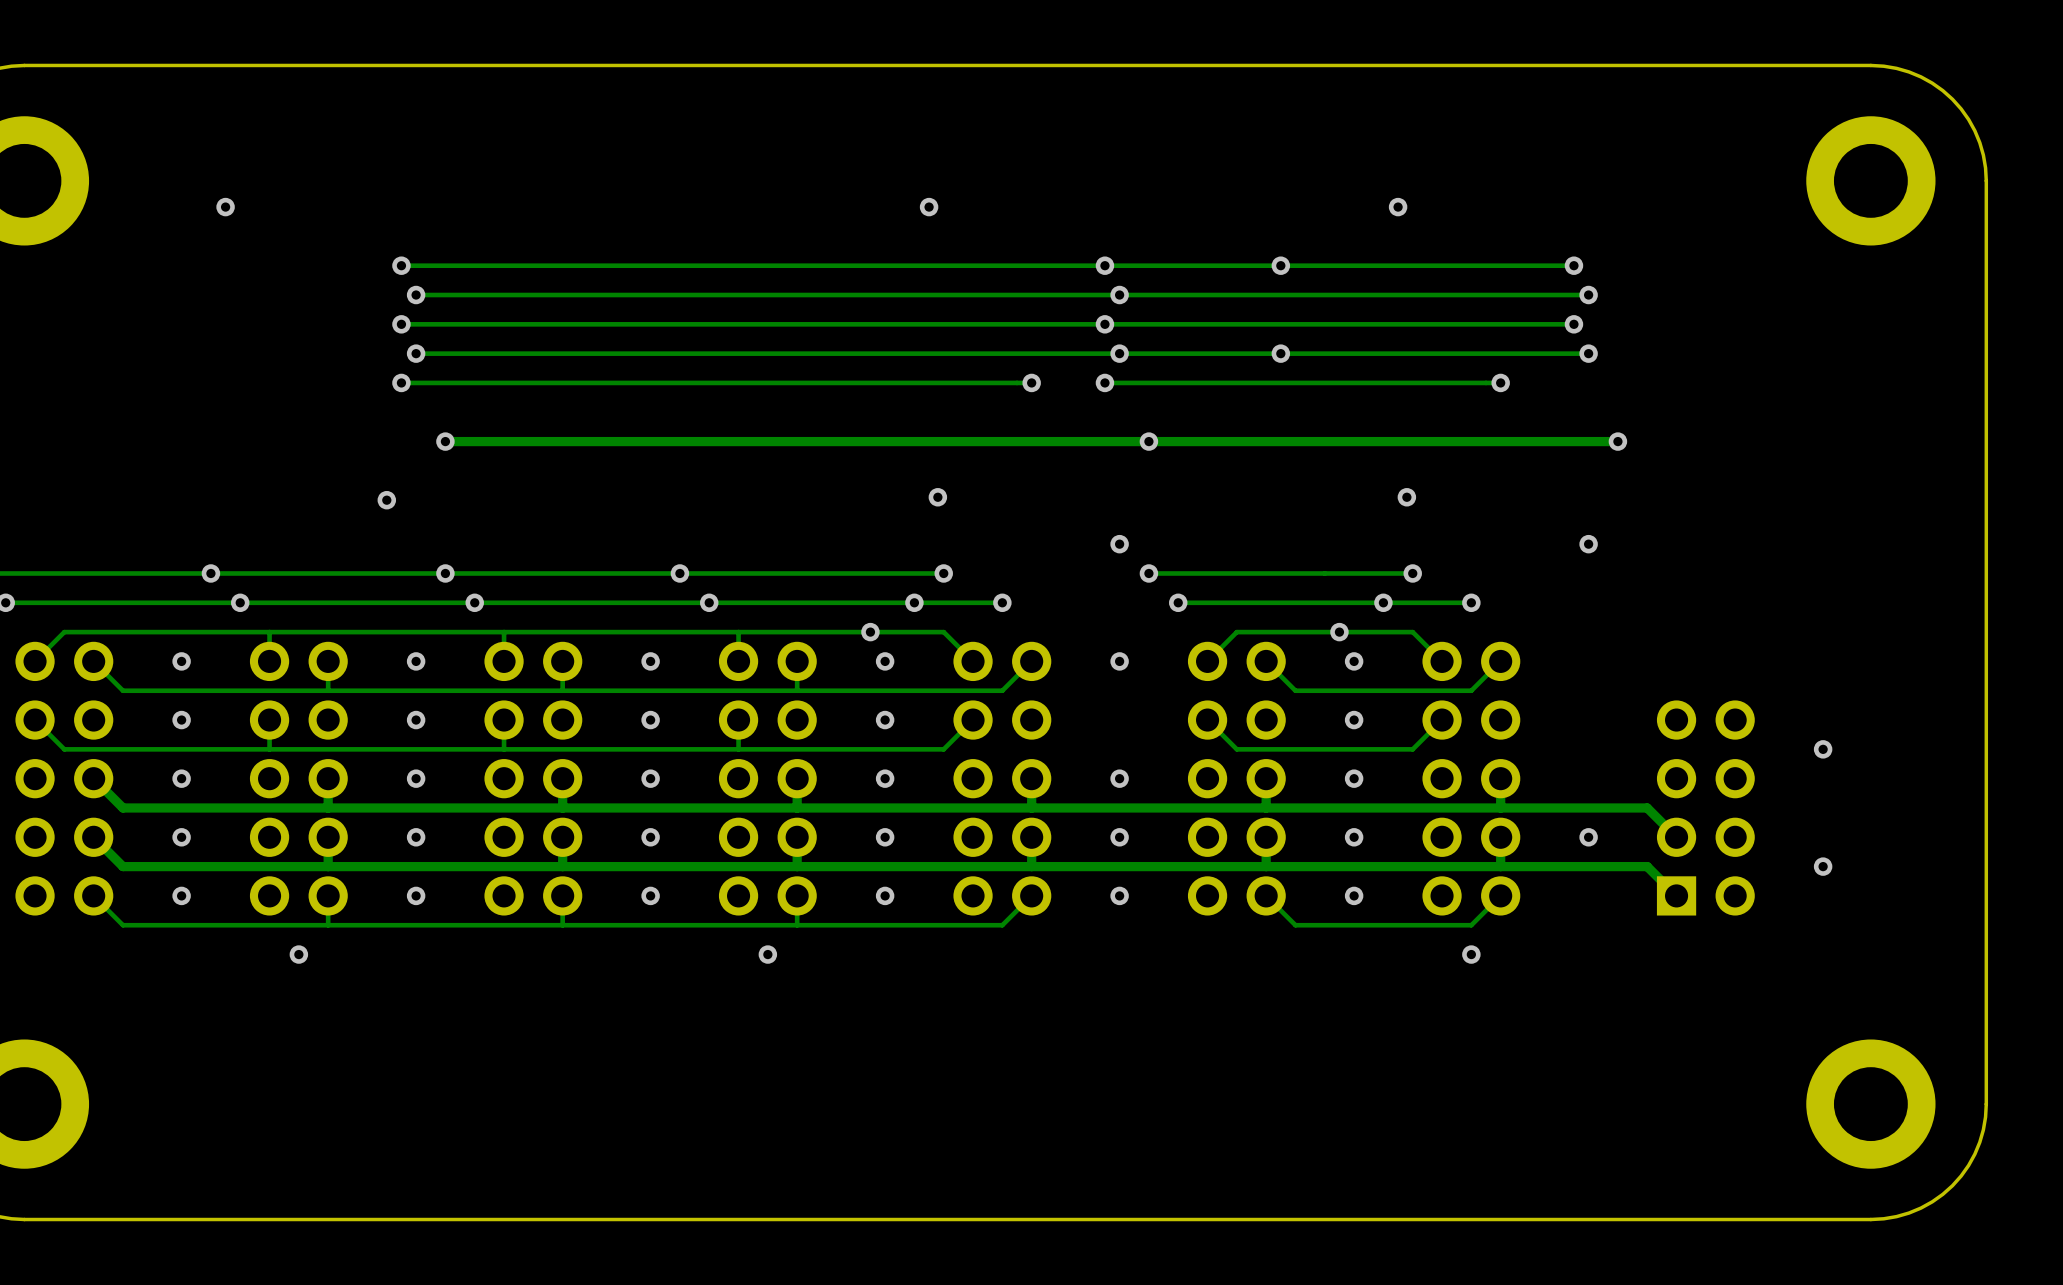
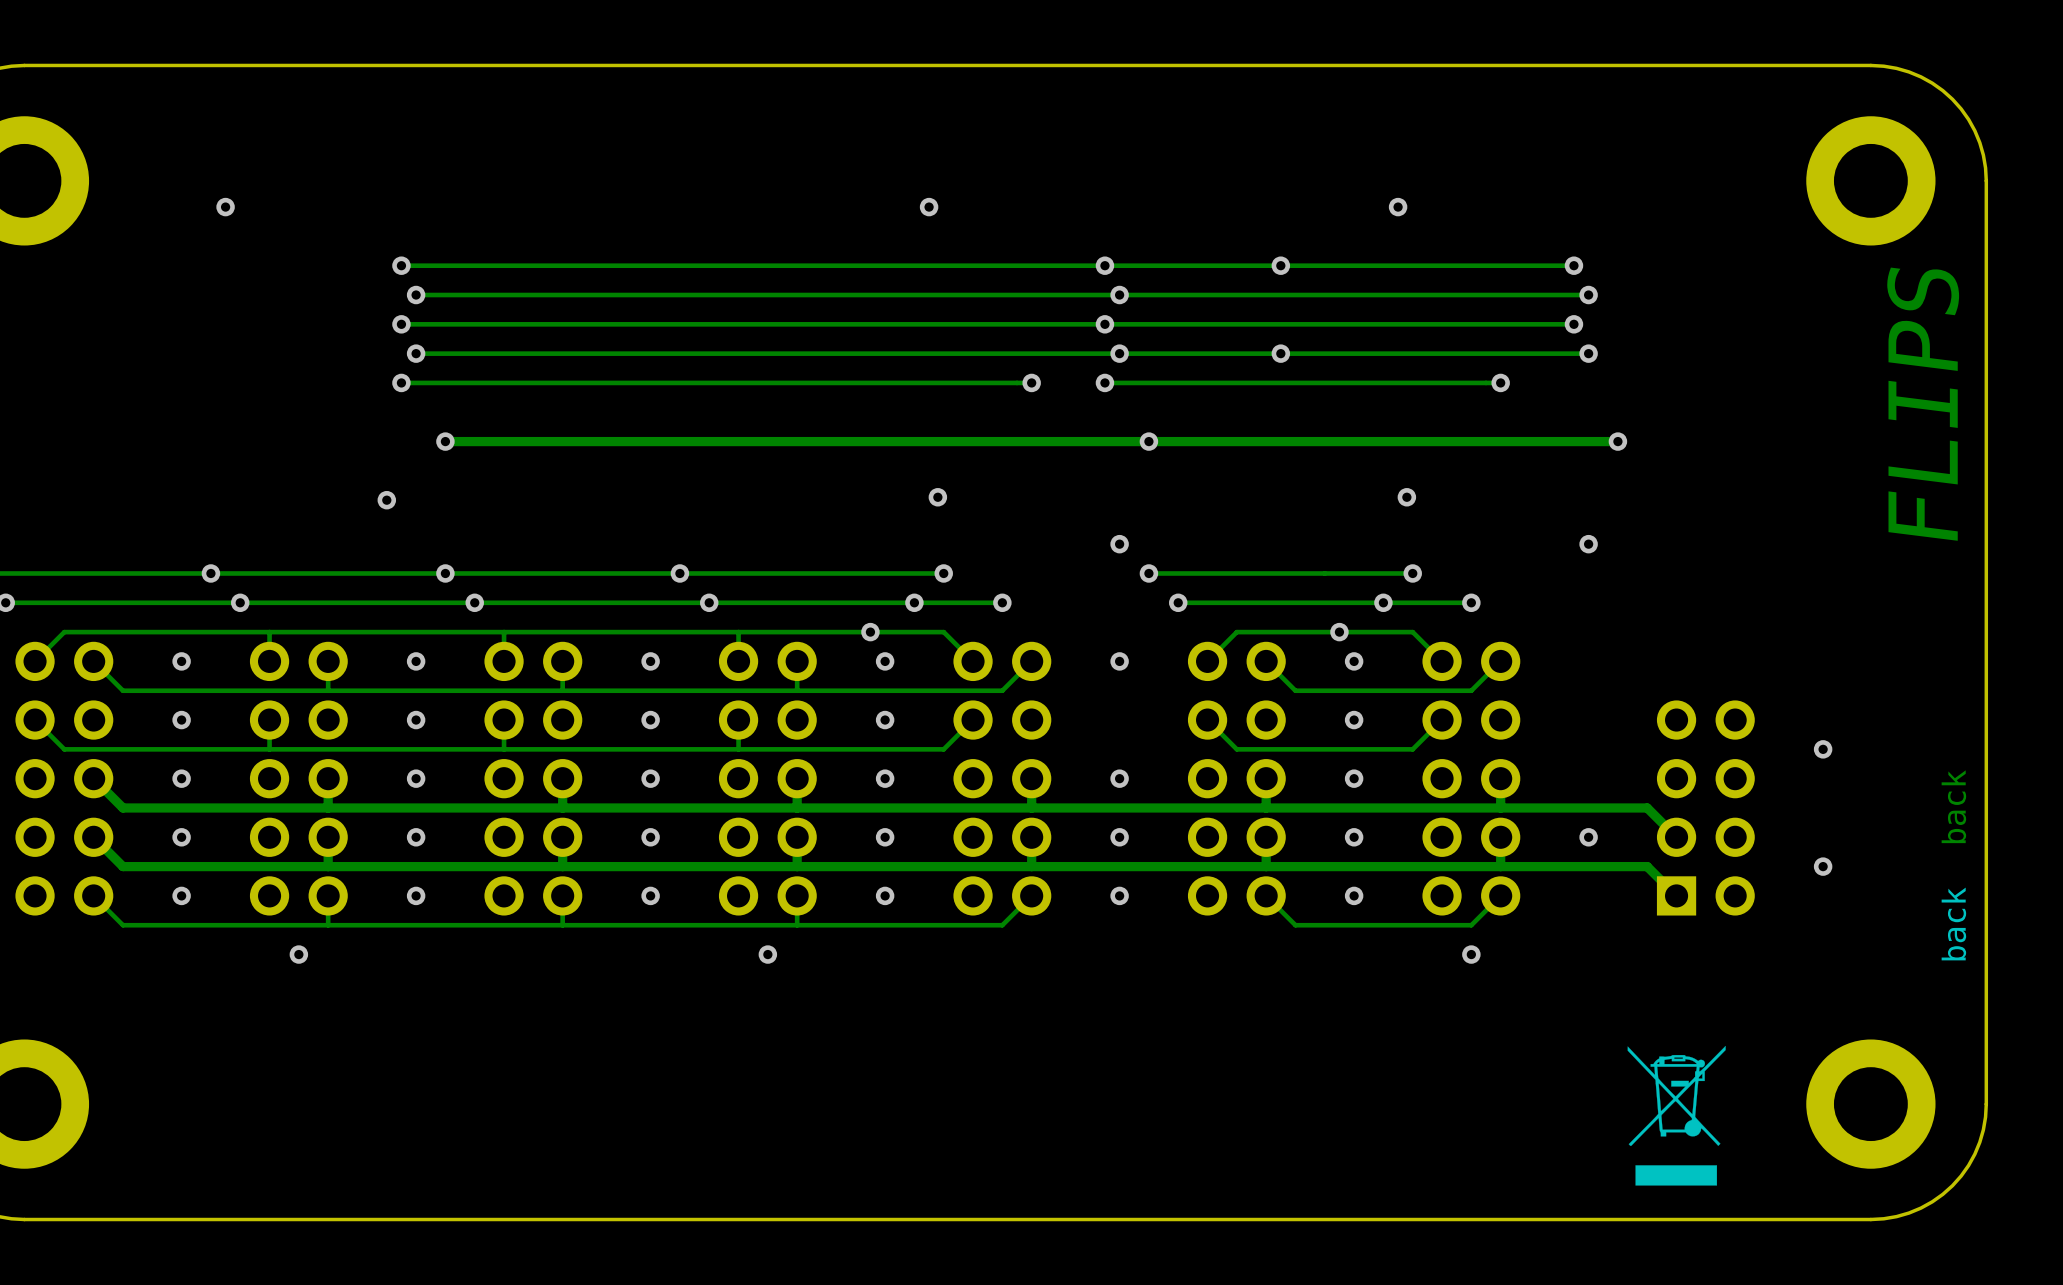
text: none -> FLIPS (1923, 404)
text: none -> back (1953, 806)
text: none -> back (1953, 923)
drawing: none -> [1627, 1045, 1726, 1186]

